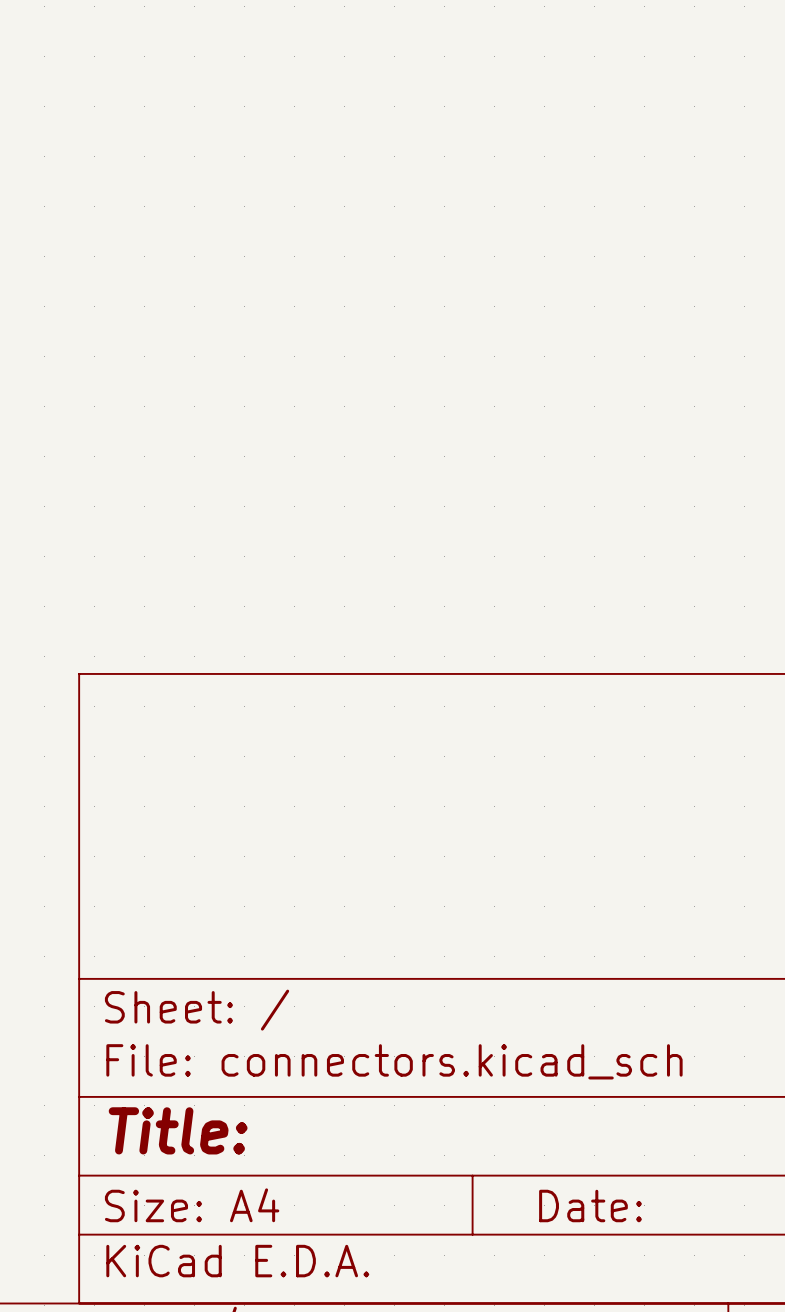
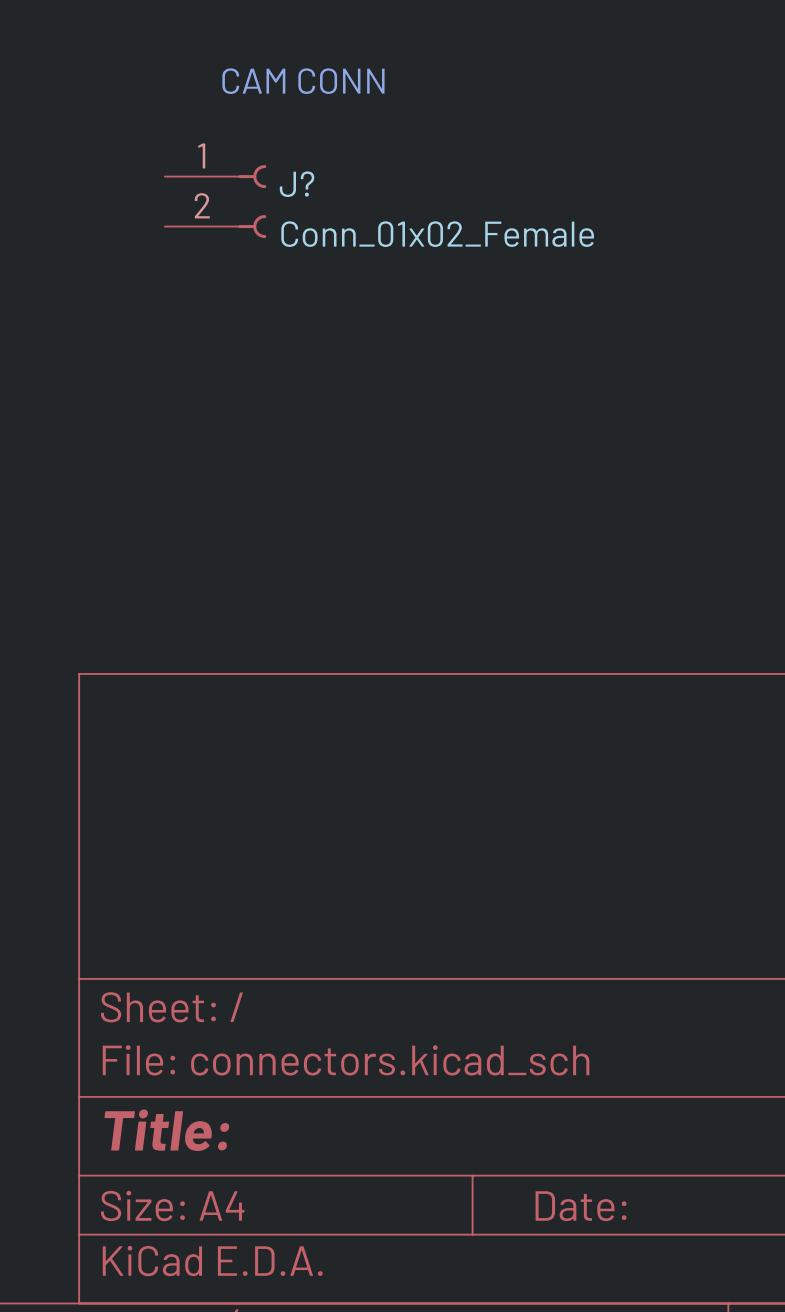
text: none -> CAM CONN (303, 81)
J?: none -> Conn_01x02_Female (215, 201)

